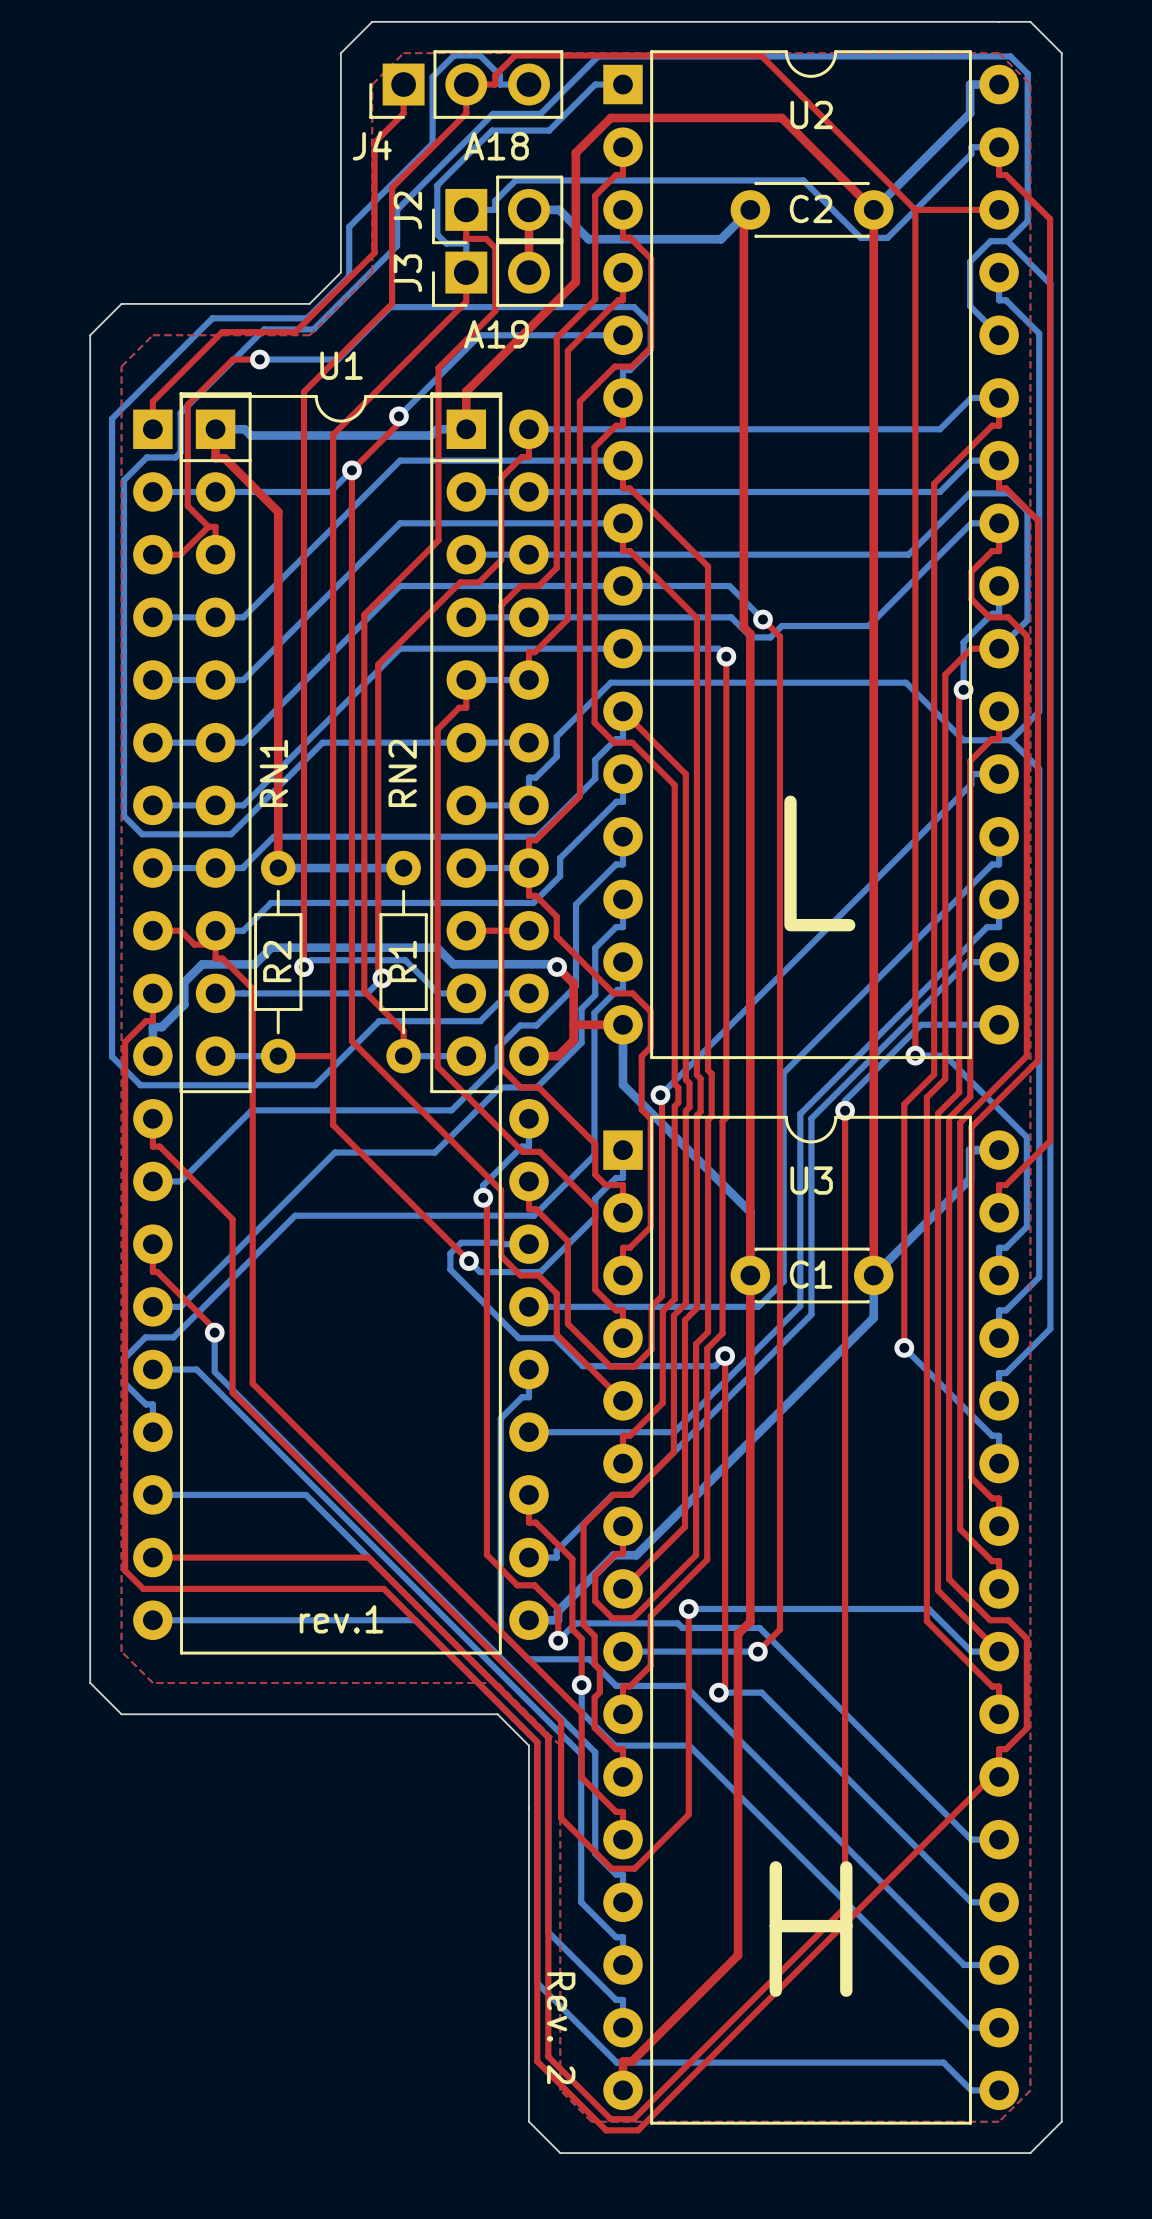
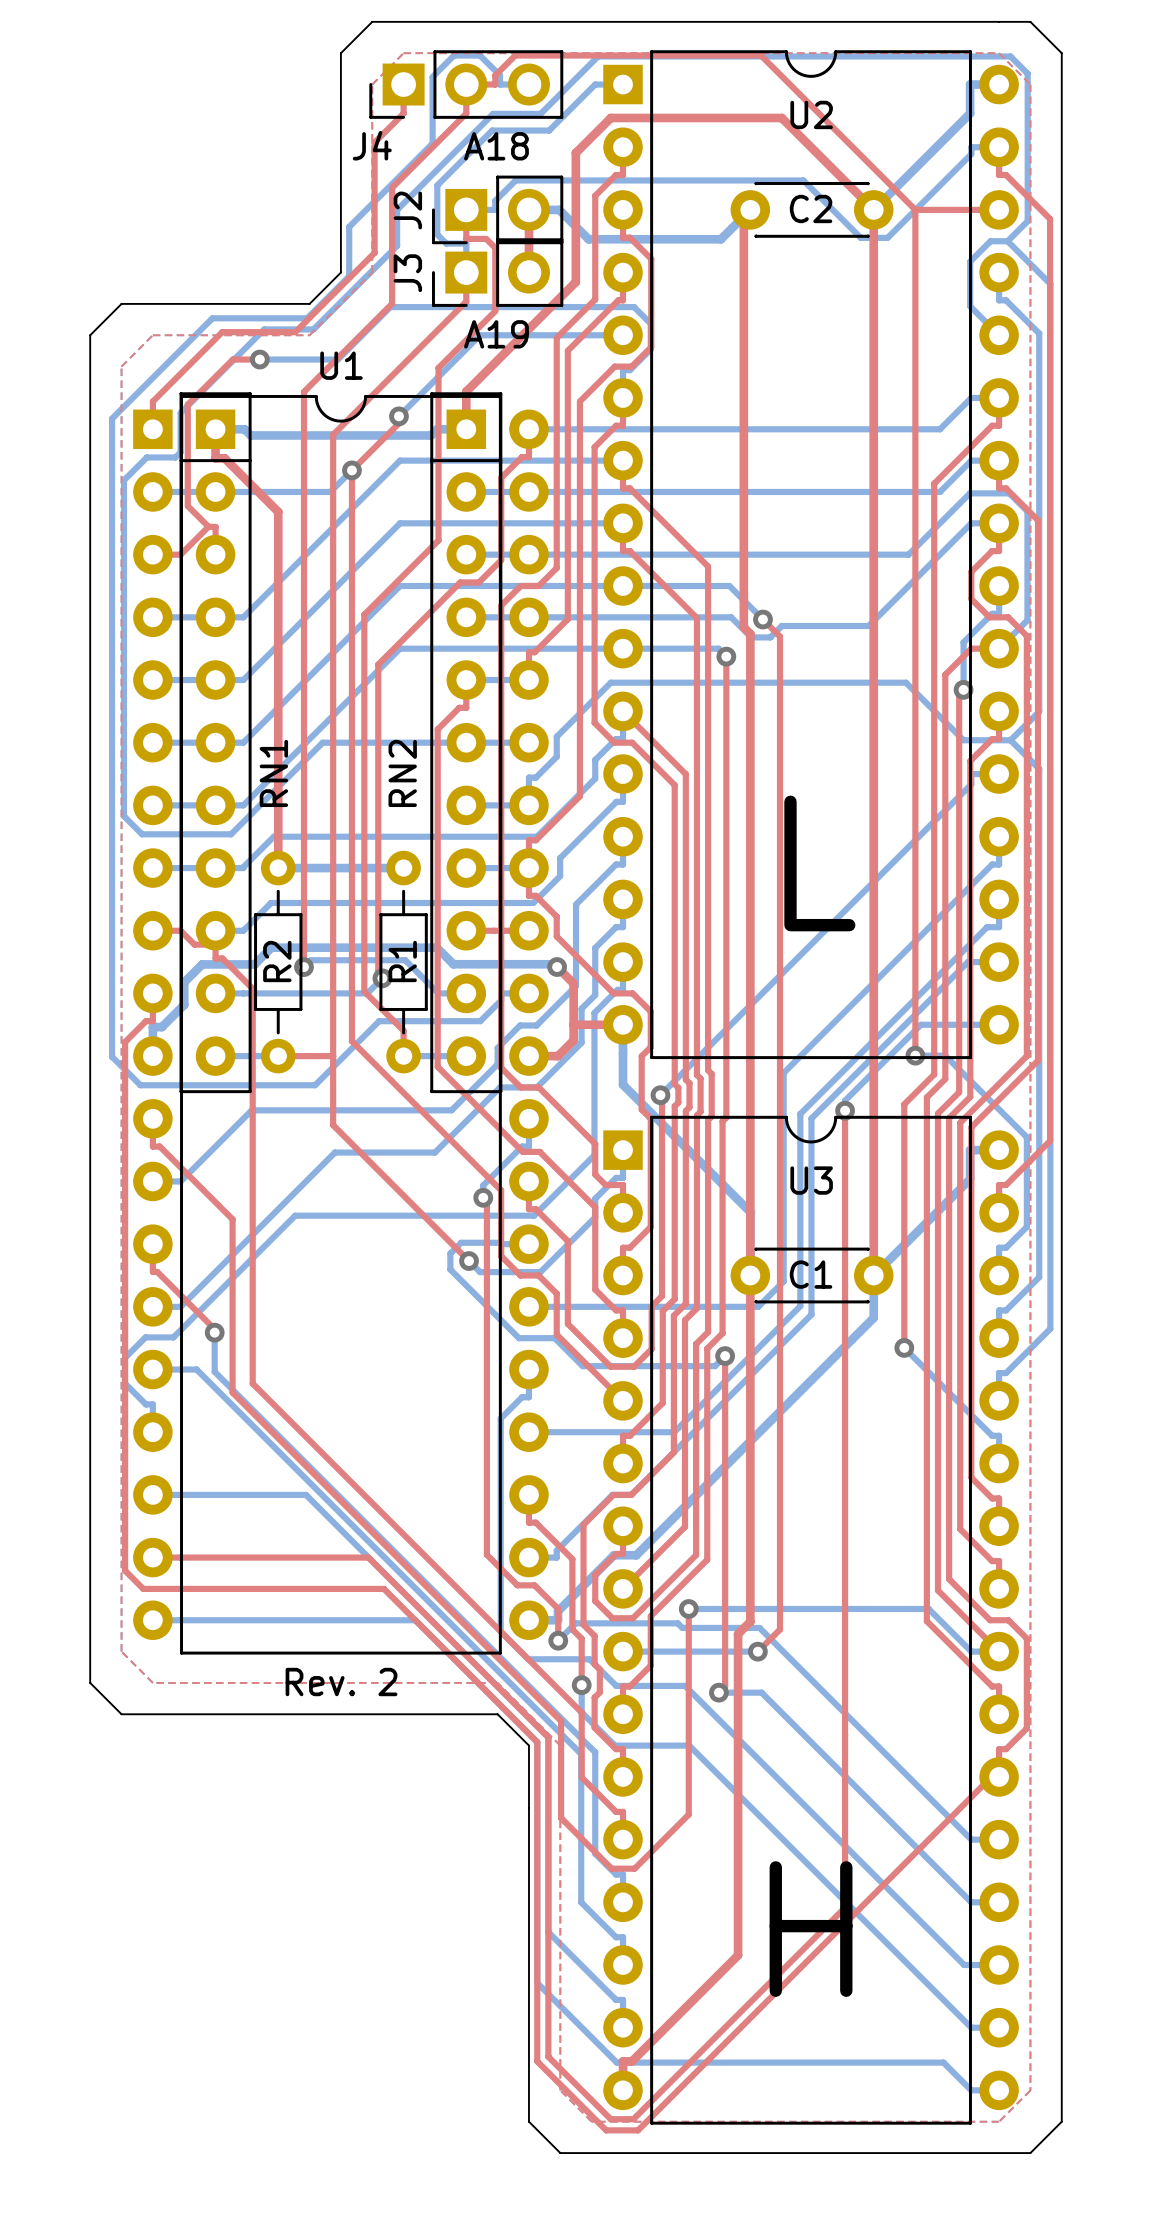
text: rev.1 (341, 1619) -> none
text rotation: 0° (561, 2028) -> 90° counterclockwise (341, 1682)
text position: Rev. 2 (561, 2028) -> Rev. 2 (341, 1682)

